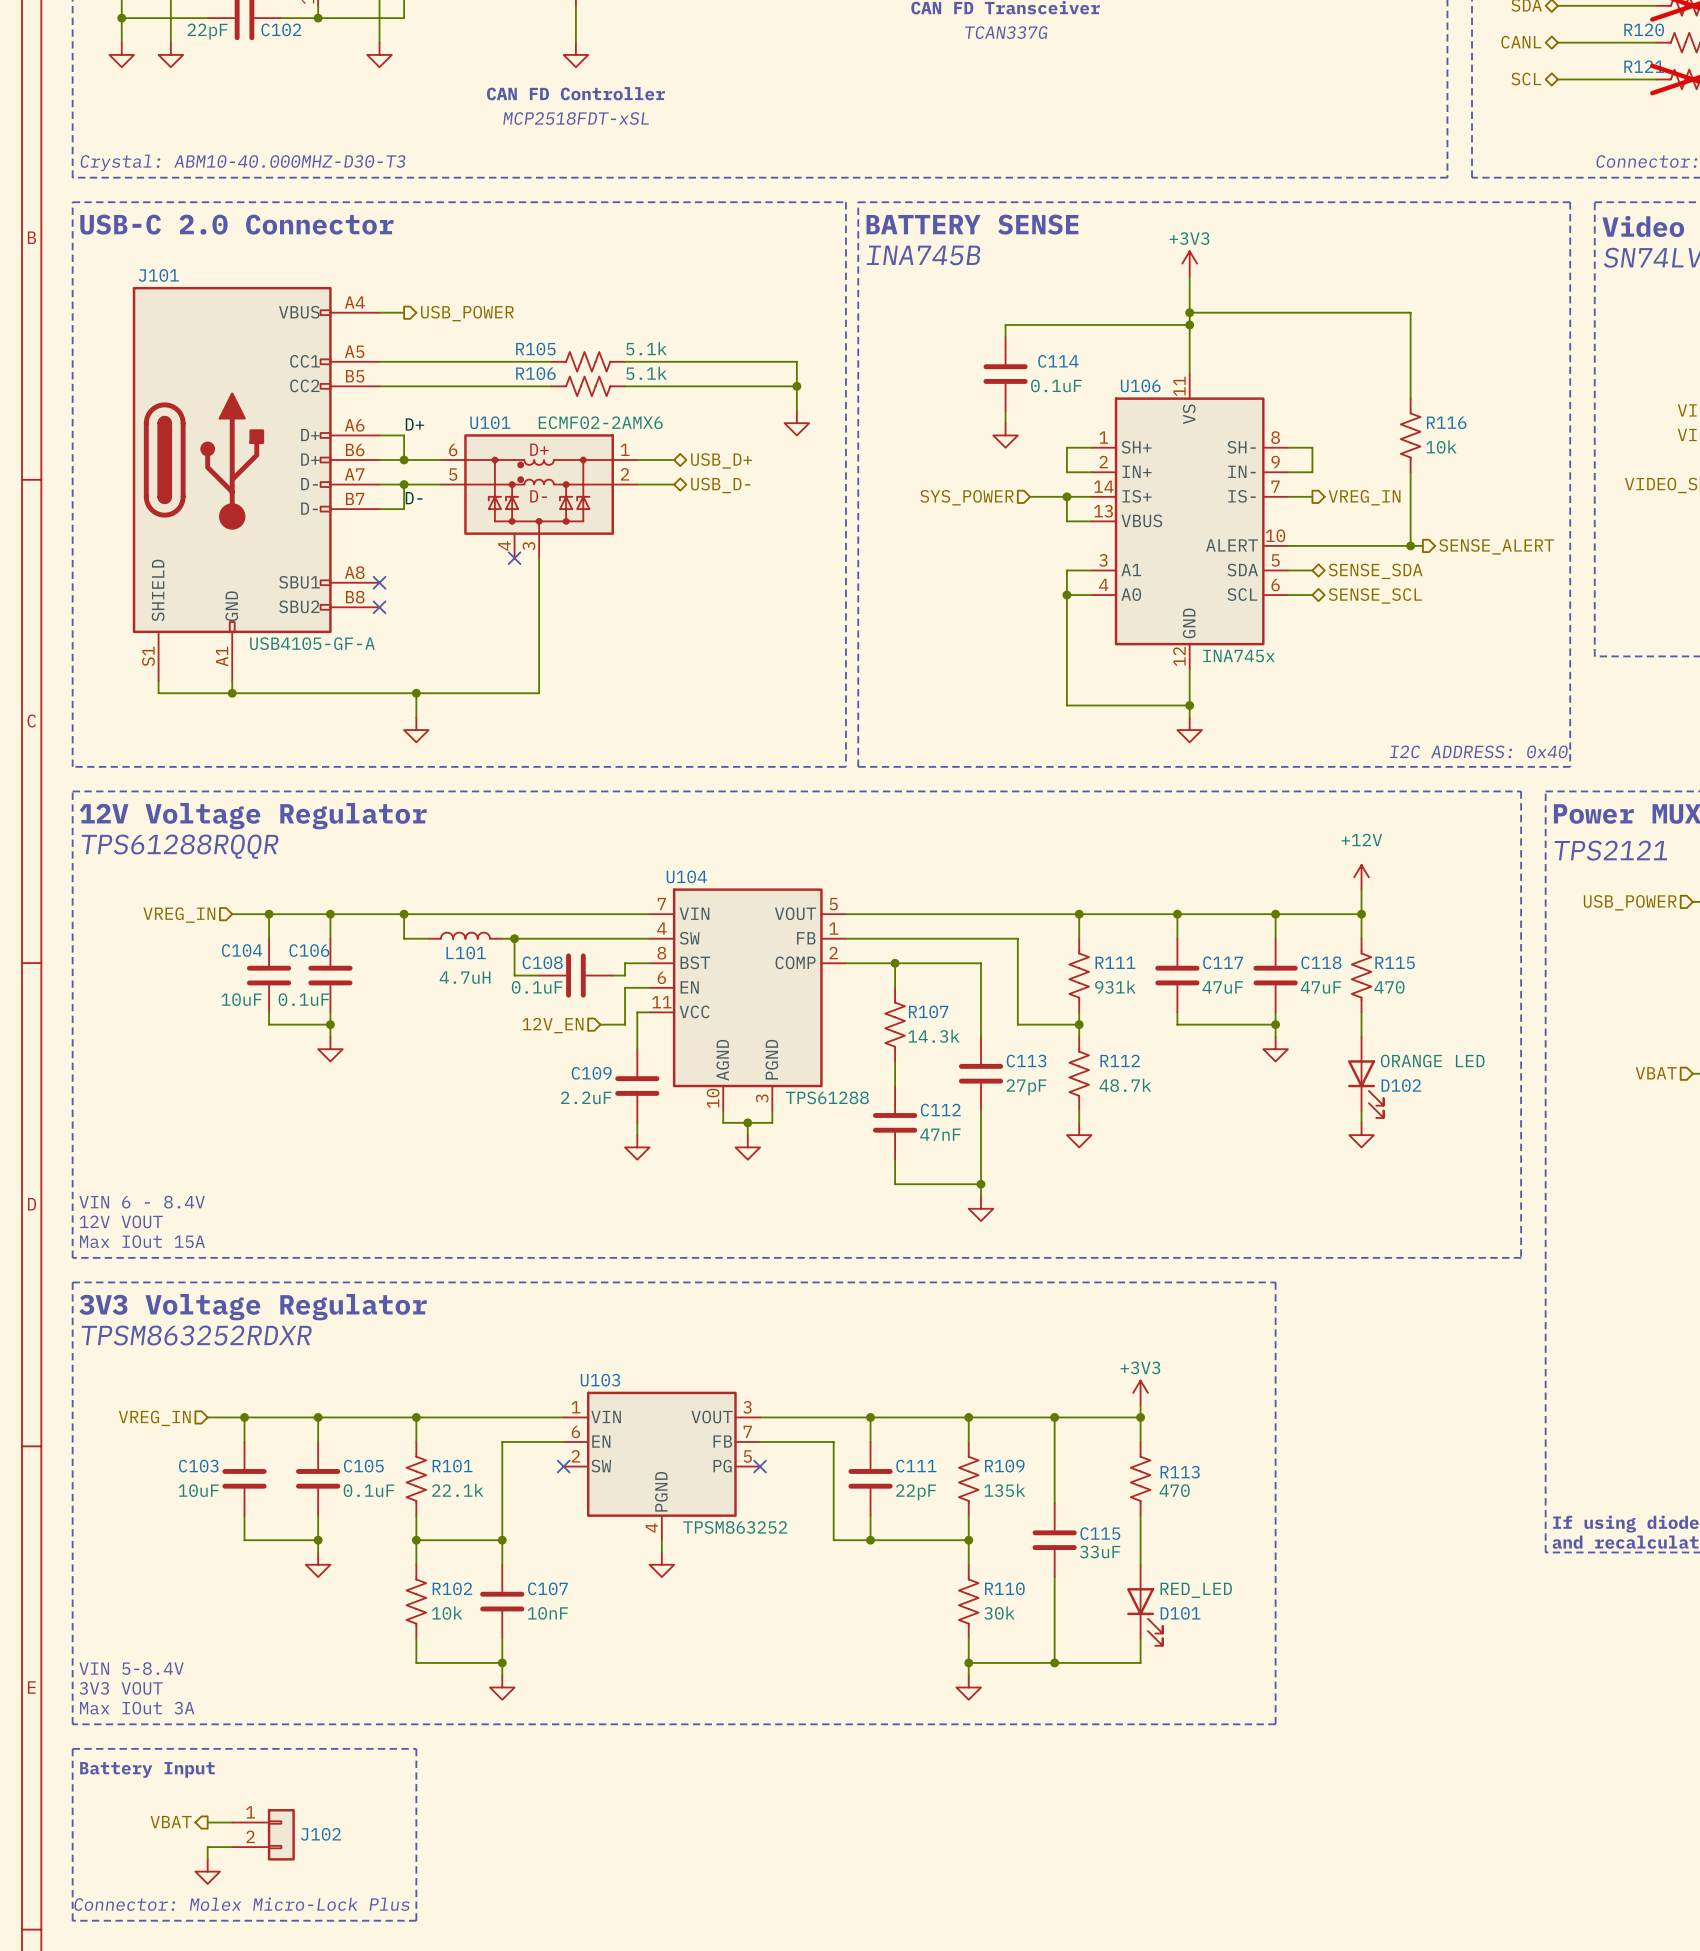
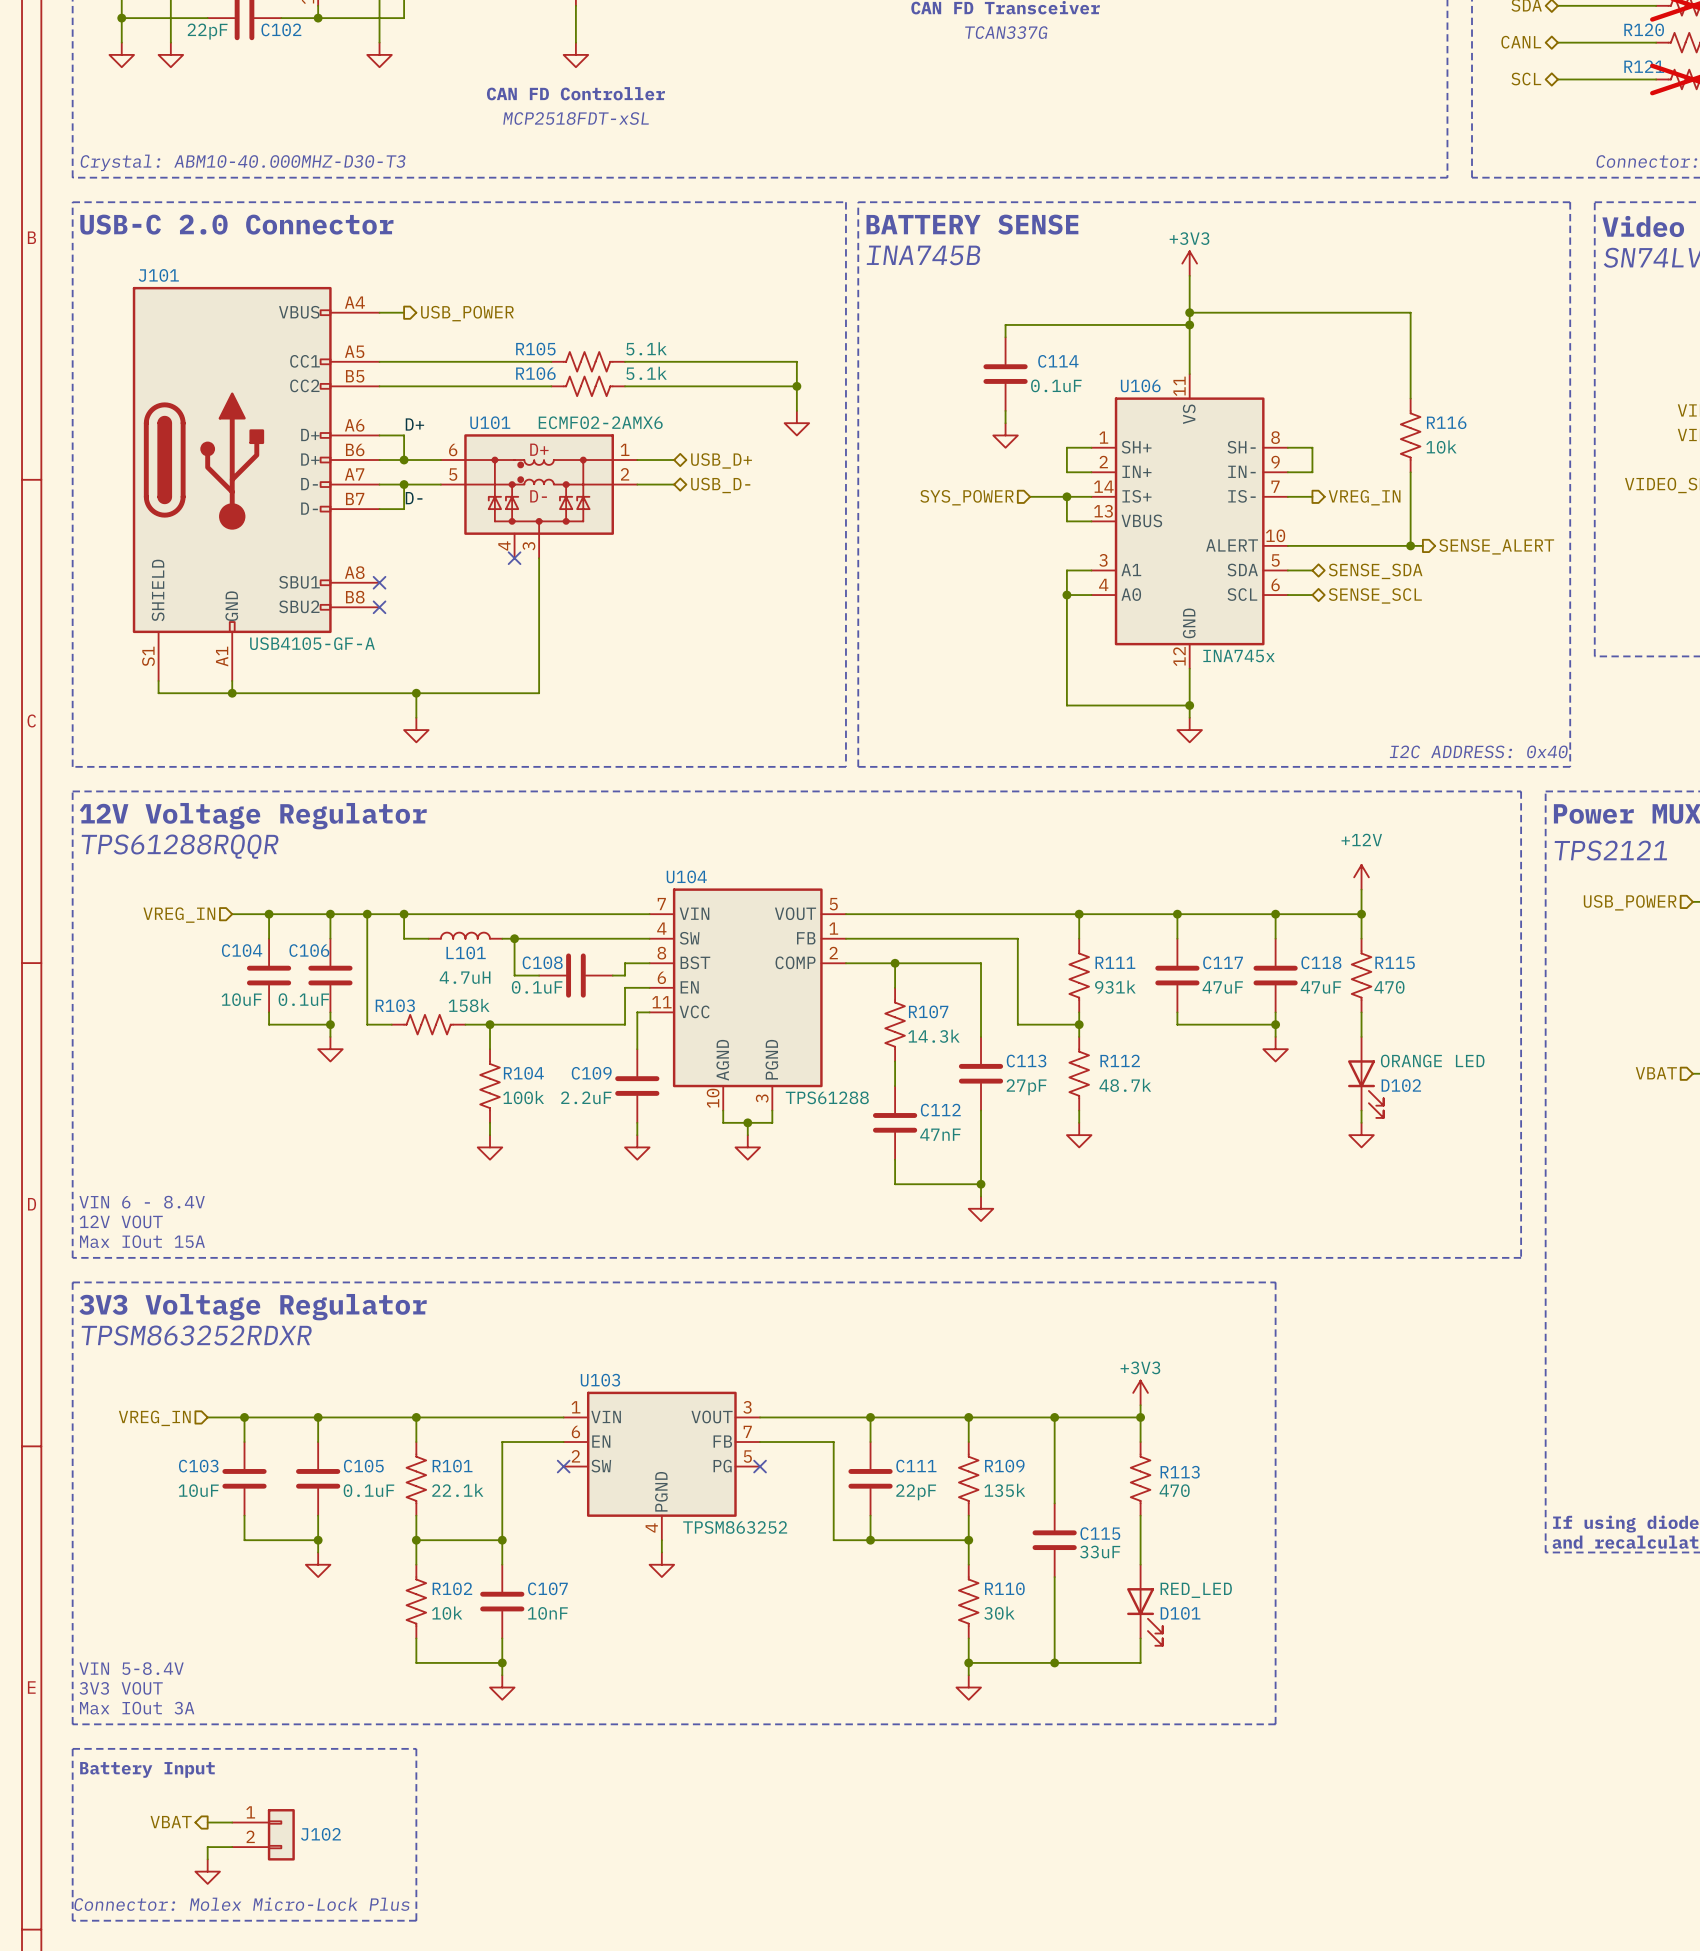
wire: none -> (367, 914) (367, 1024) (391, 1024)
junction: none -> (367, 914)
R103: none -> 158k (428, 1024)
wire: none -> (465, 1024) (600, 1024)
wire: none -> (490, 1024) (490, 1049)
junction: none -> (490, 1024)
hierarchical label: 12V_EN (553, 1025) -> none
R104: none -> 100k (490, 1086)
wire: none -> (490, 1122) (490, 1135)
power symbol: none -> (490, 1147)

